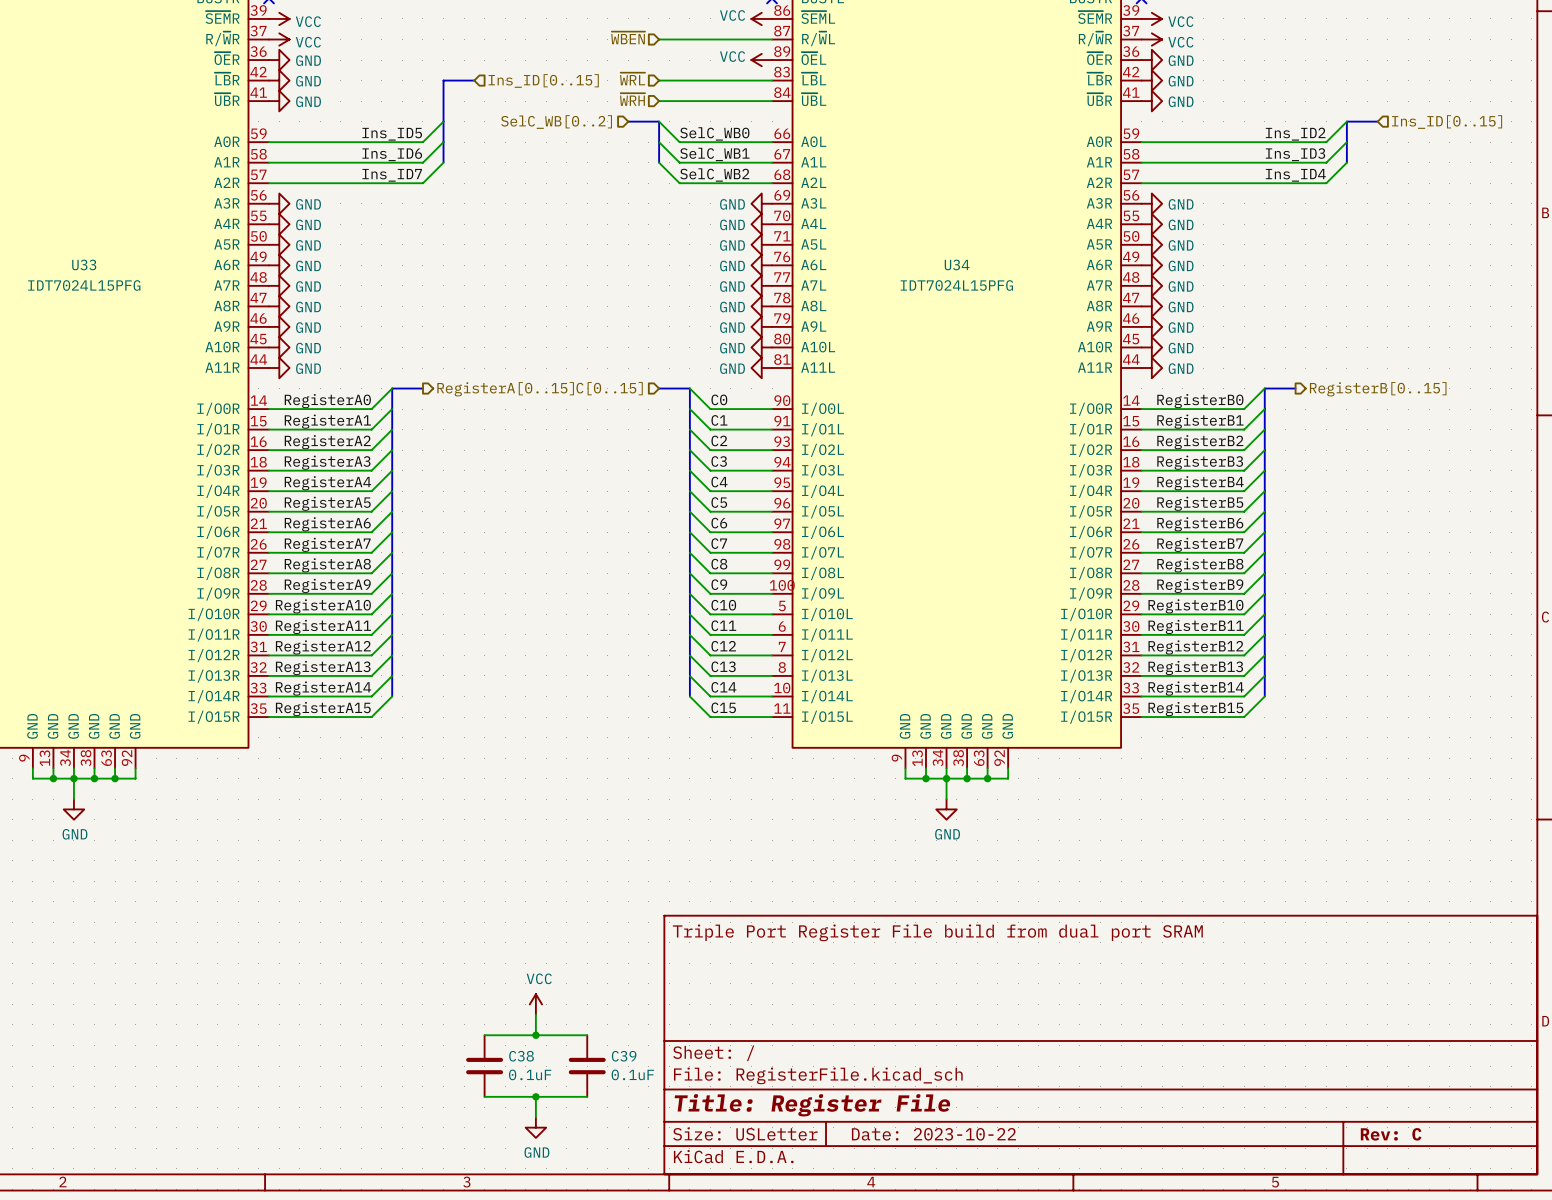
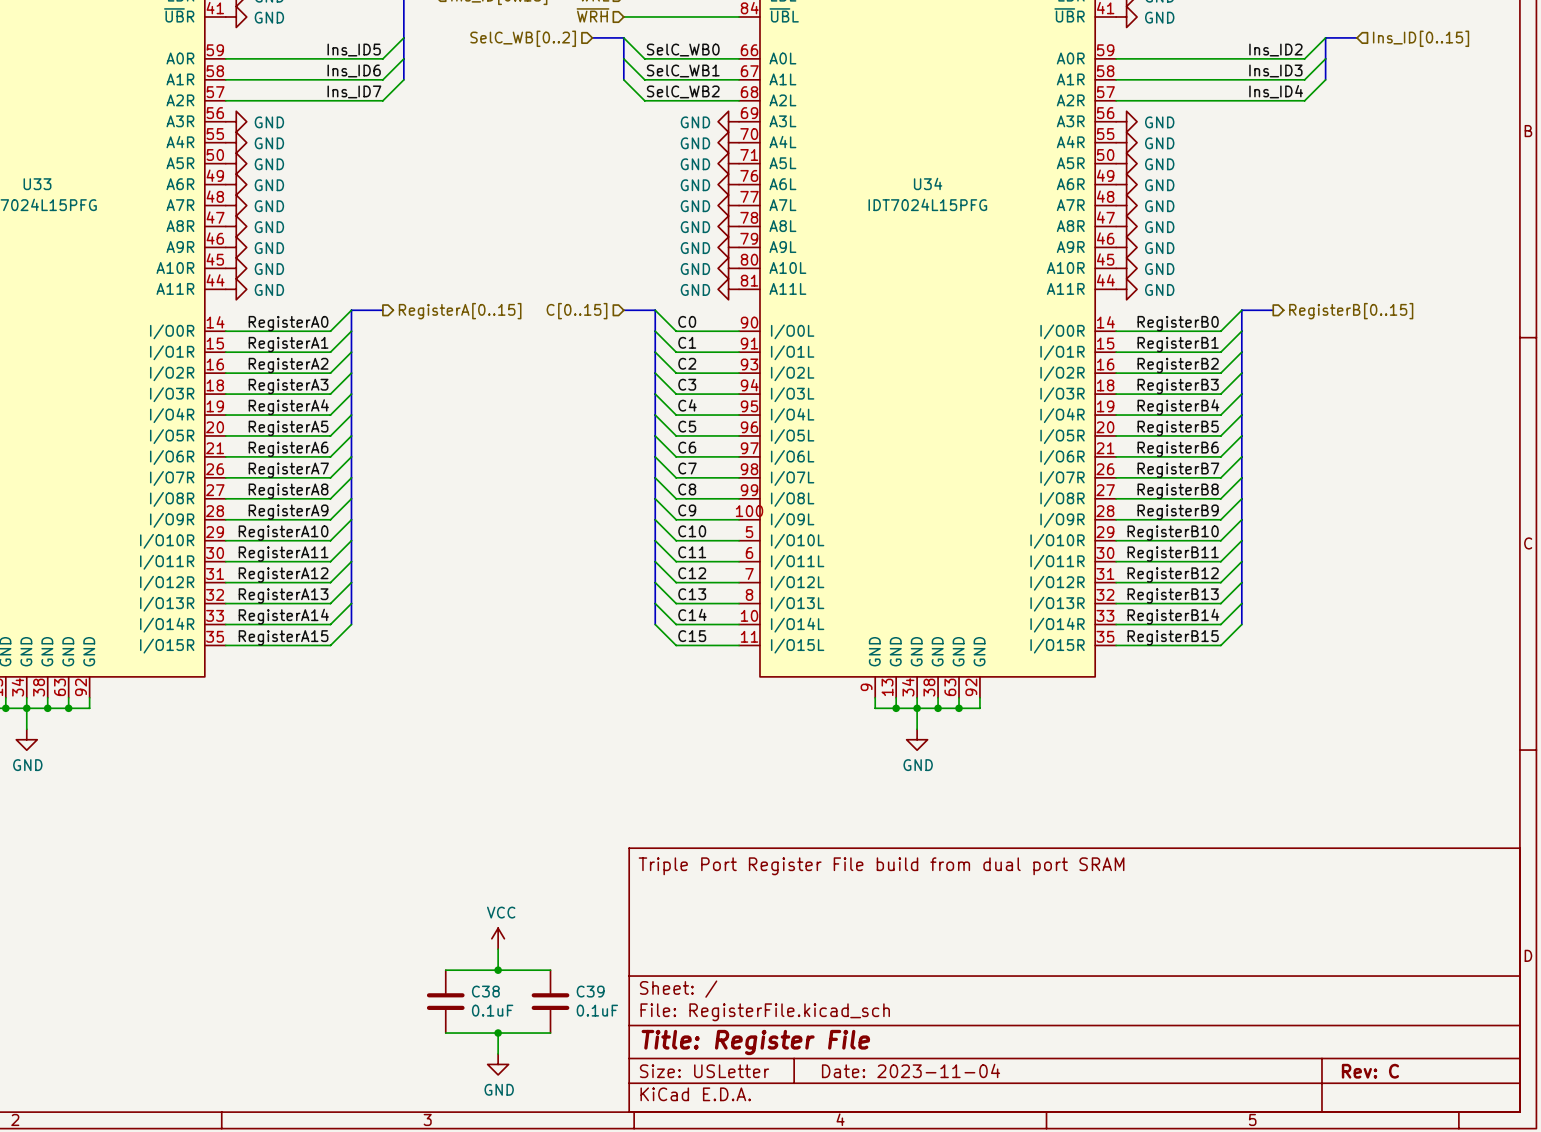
title block: Date: 2023-10-22 (933, 1134) -> Date: 2023-11-04 (911, 1070)

